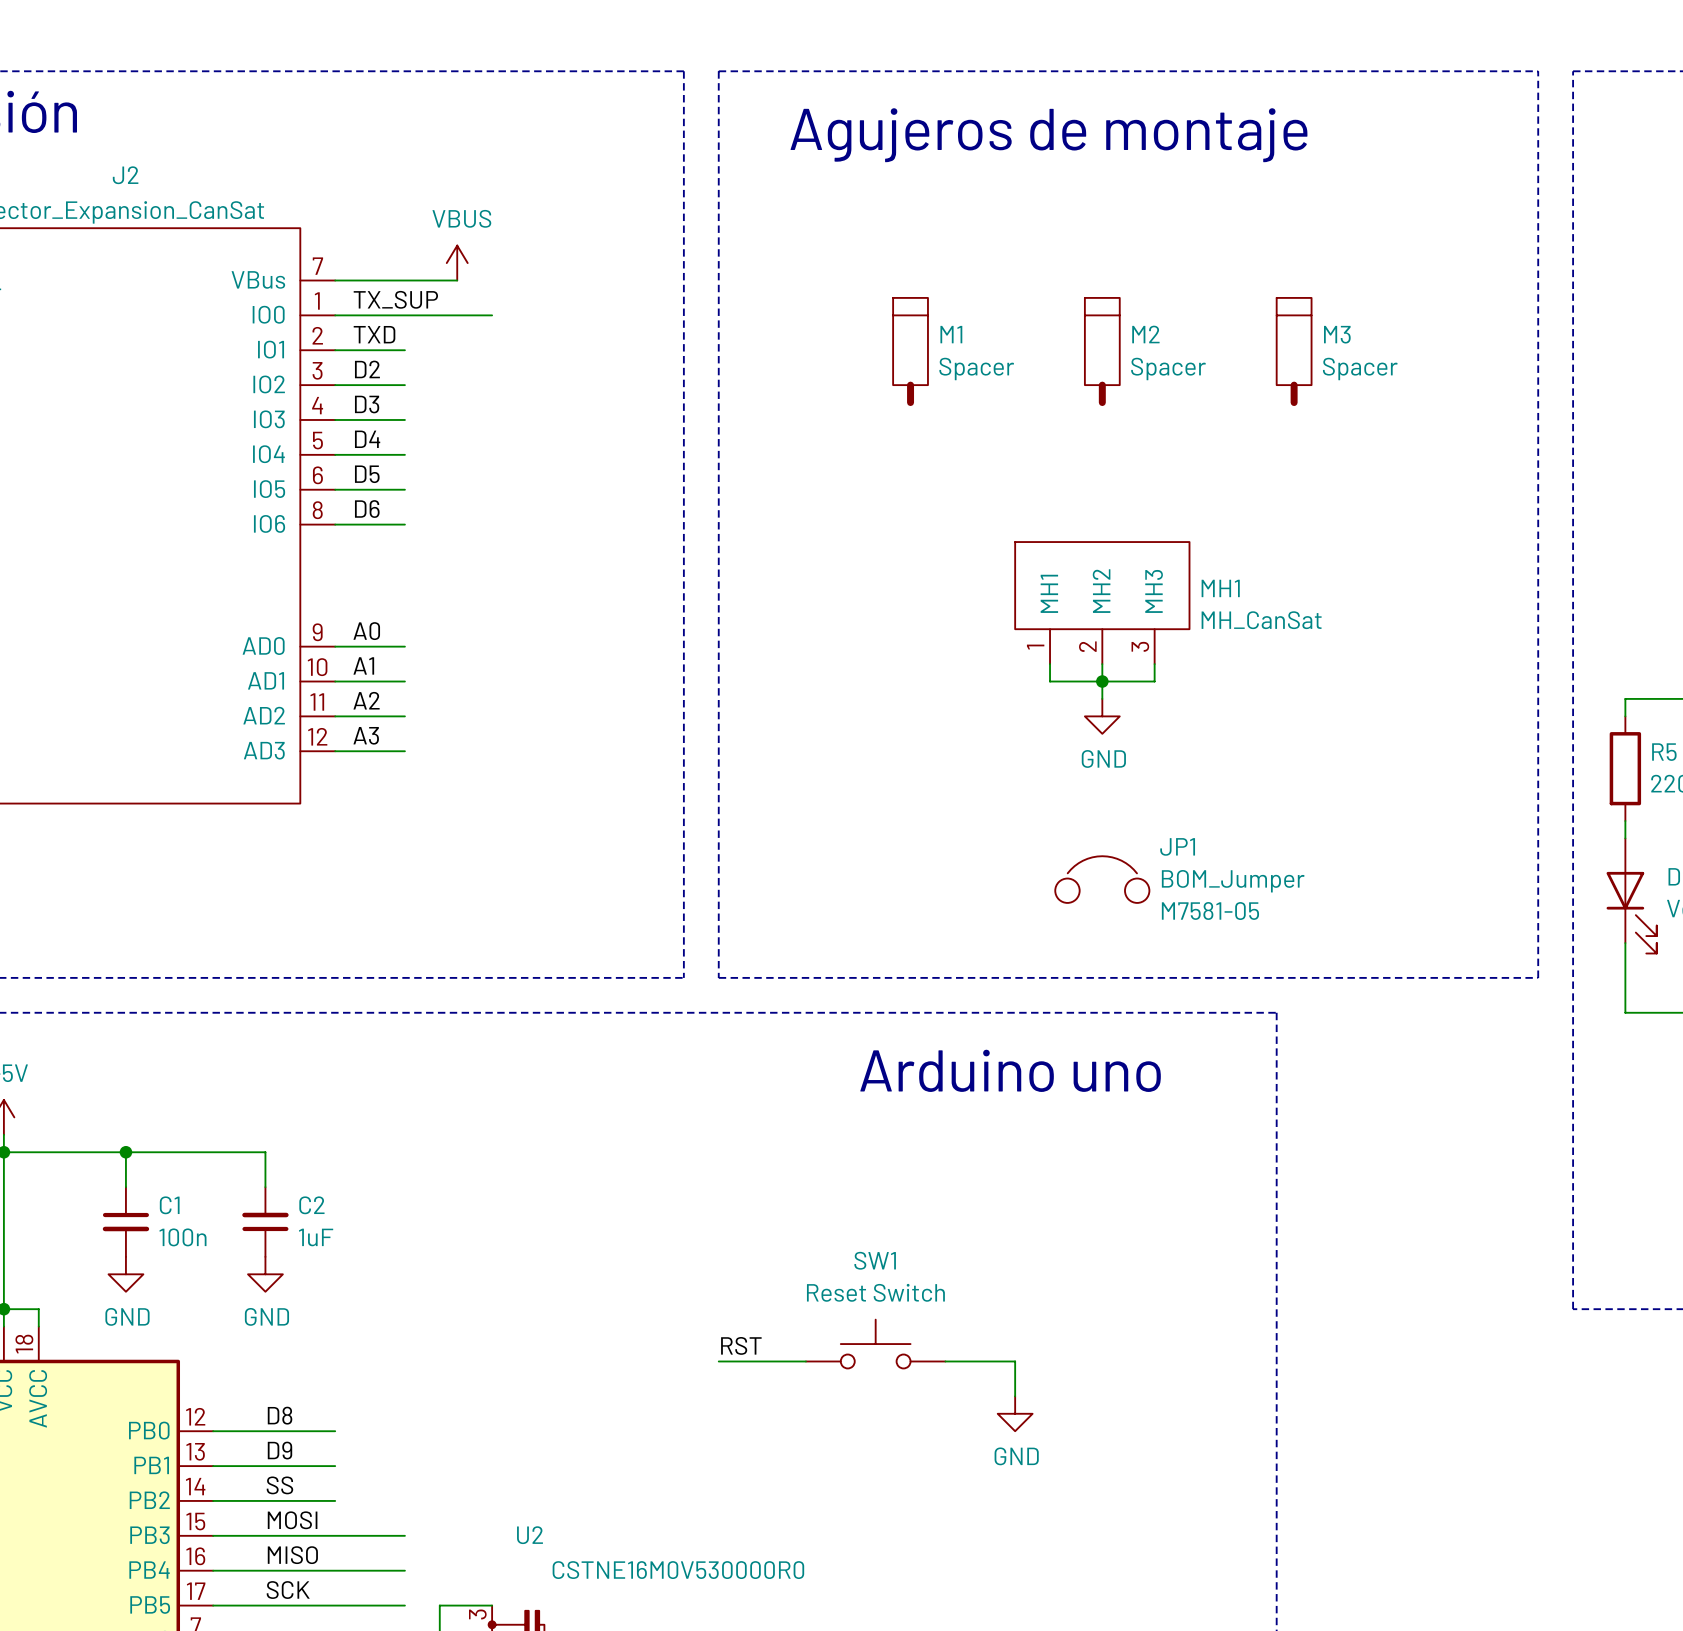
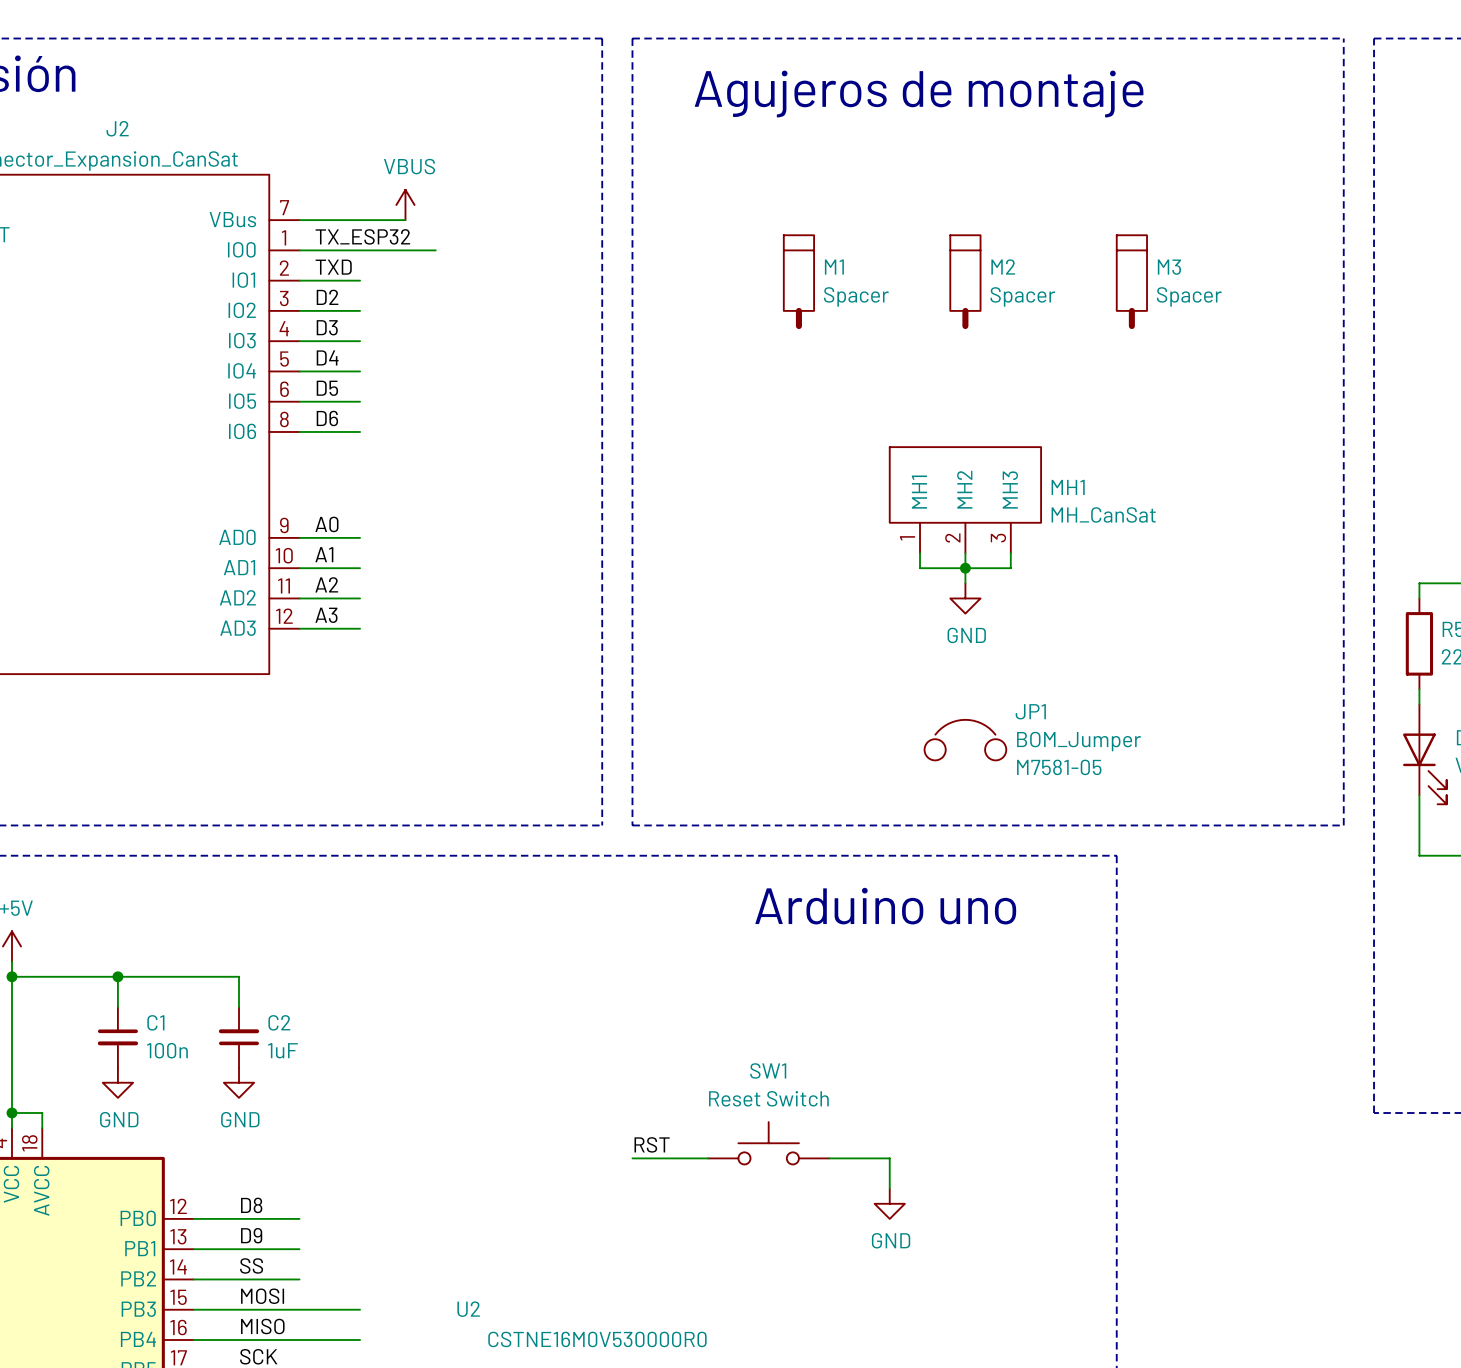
label: TX_SUP (395, 299) -> TX_ESP32 (362, 236)

